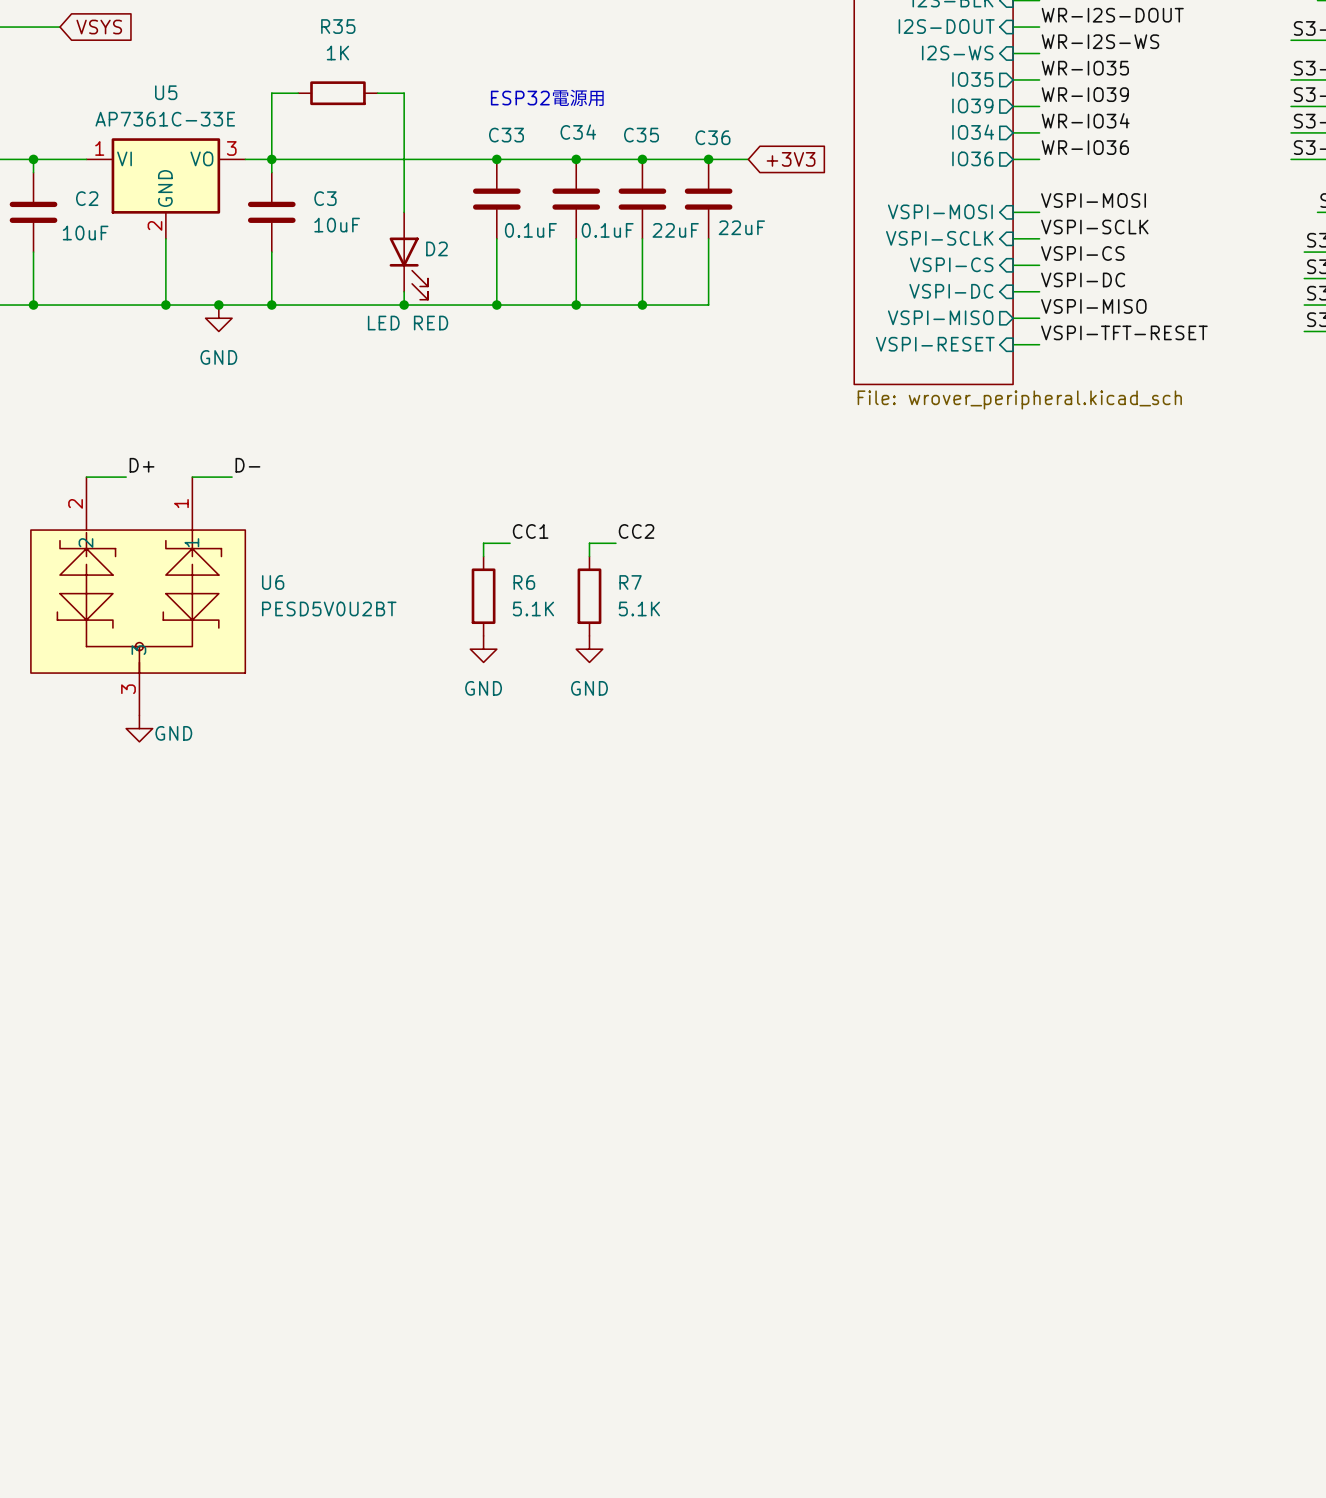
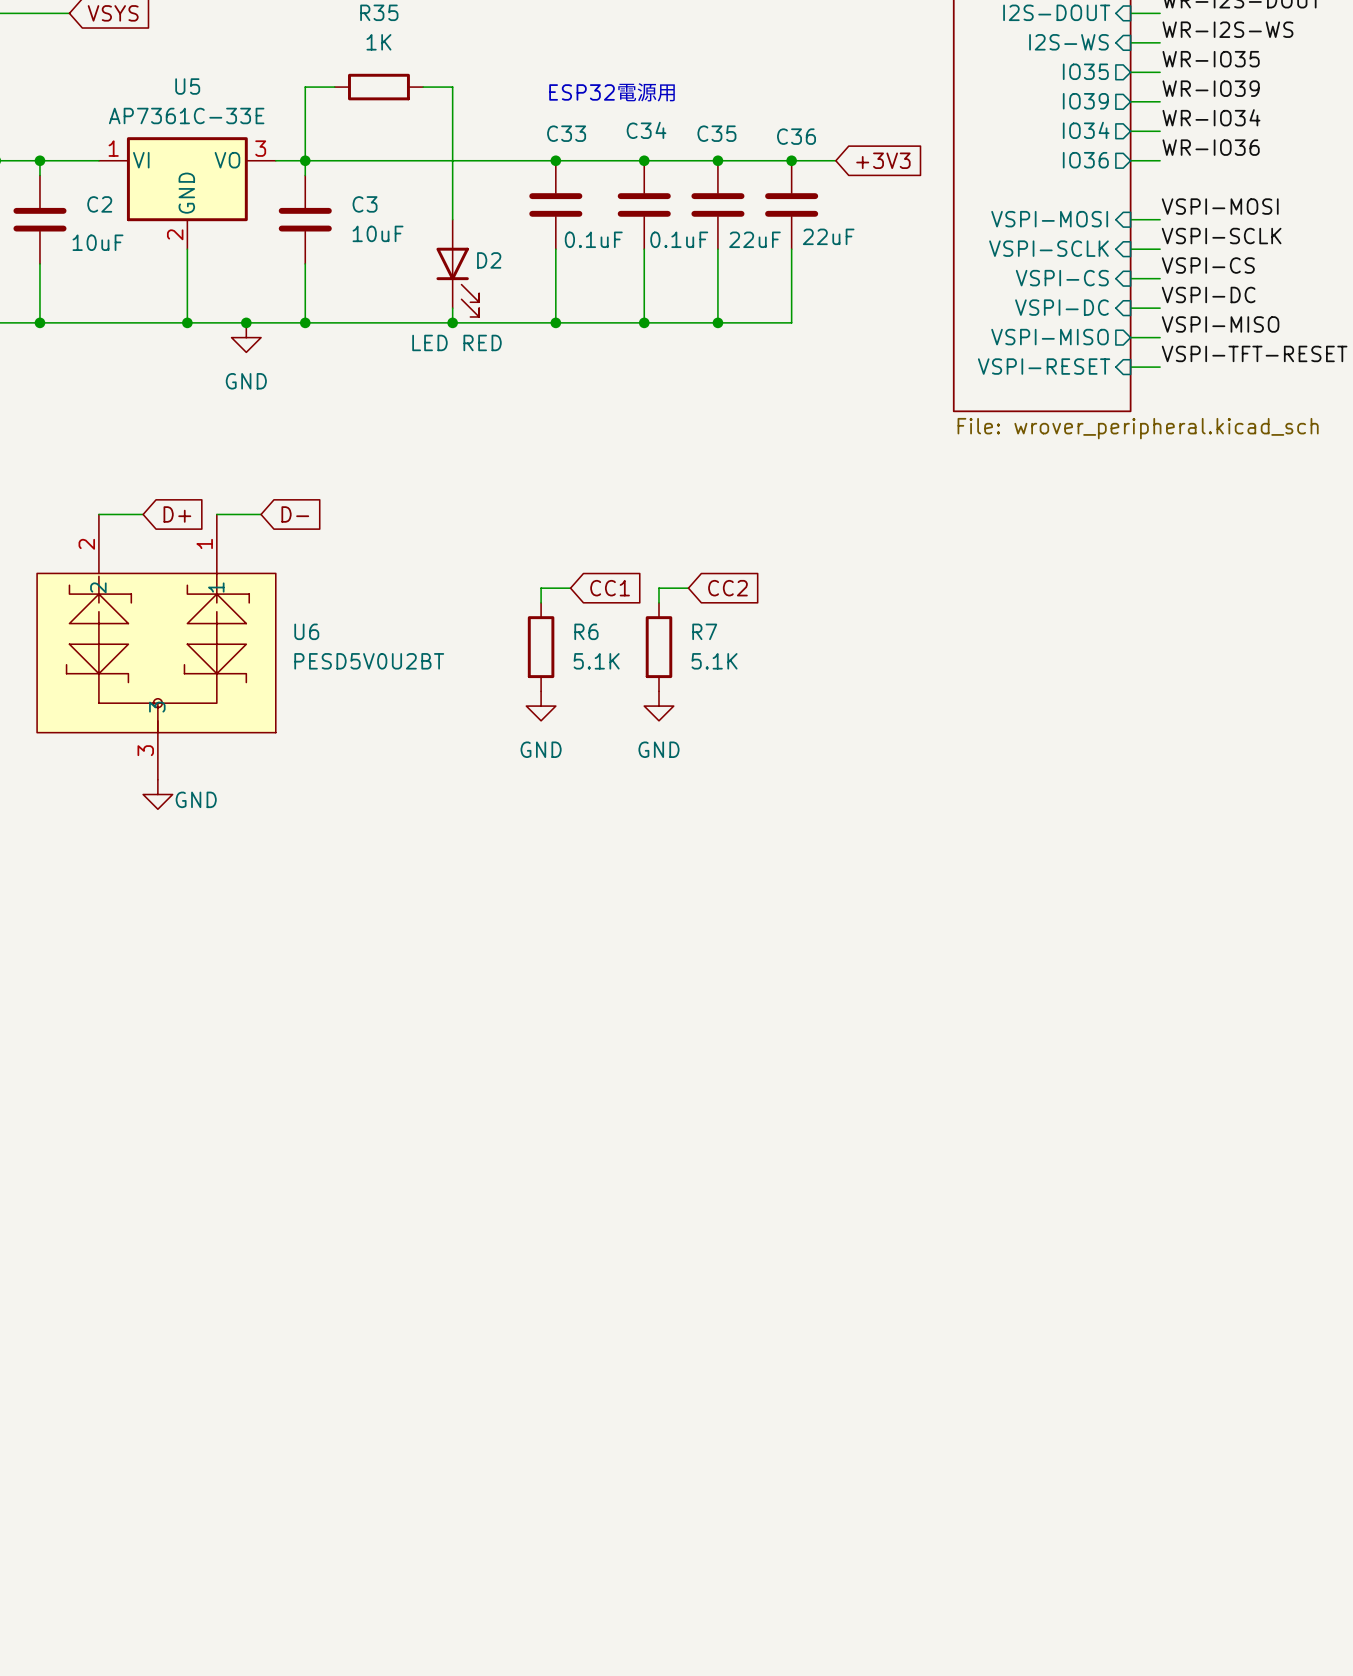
label: D+ (142, 465) -> none
label: D- (247, 465) -> none
global label: none -> D+ (177, 514)
global label: none -> D- (295, 514)
label: CC1 (530, 531) -> none
label: CC2 (636, 531) -> none
global label: none -> CC1 (610, 588)
global label: none -> CC2 (727, 588)

